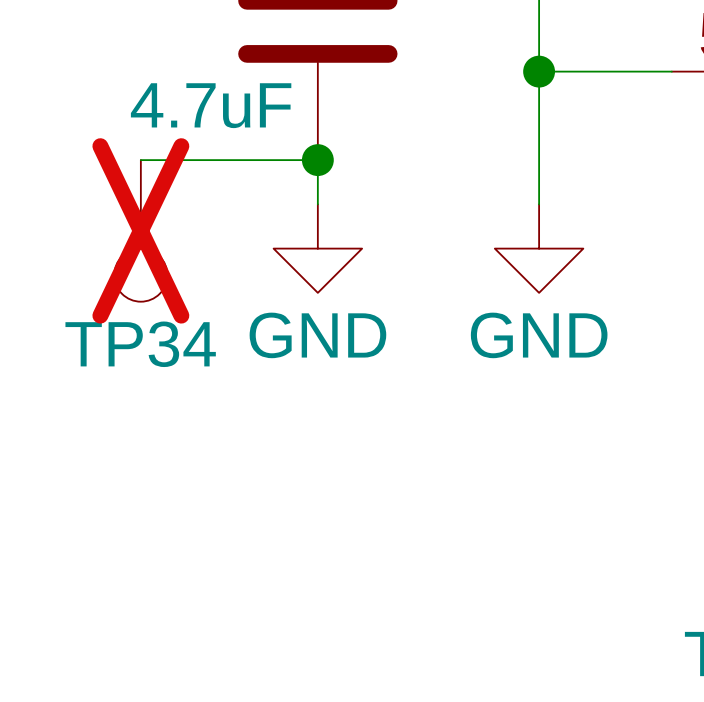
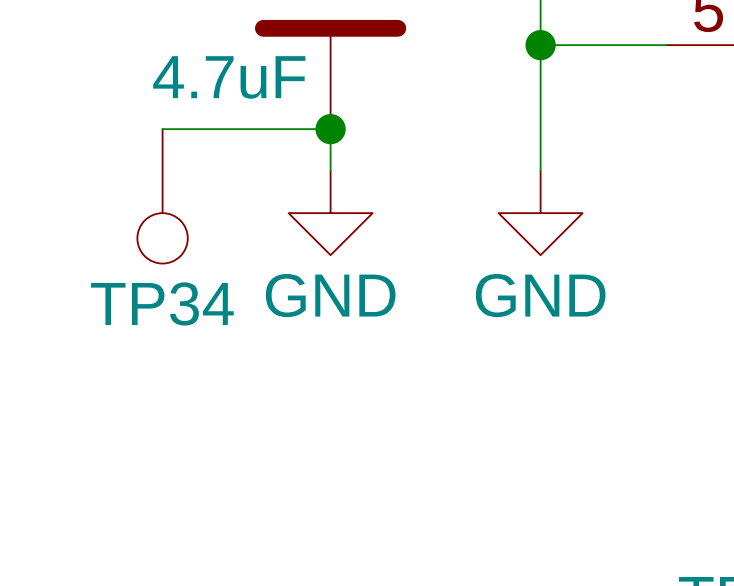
TP34 do-not-place cross: (140, 230) -> none

